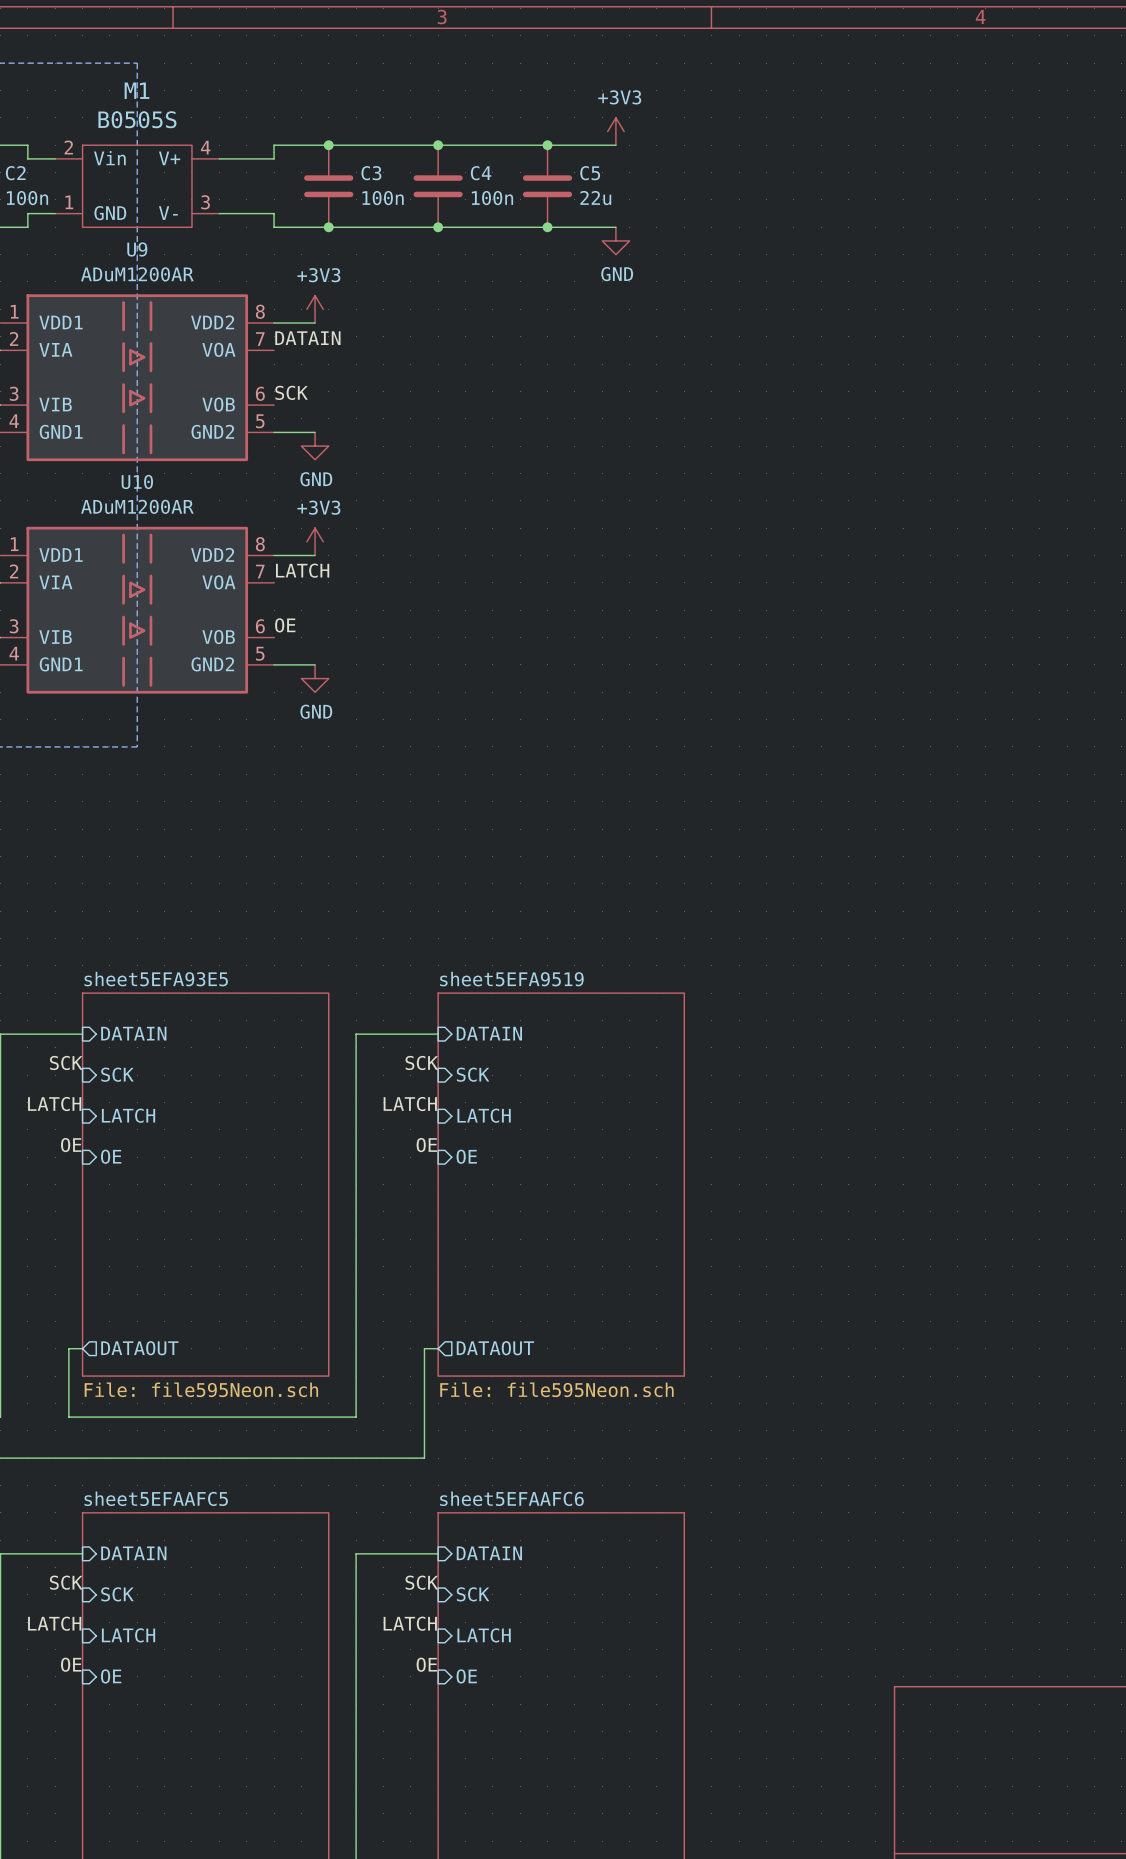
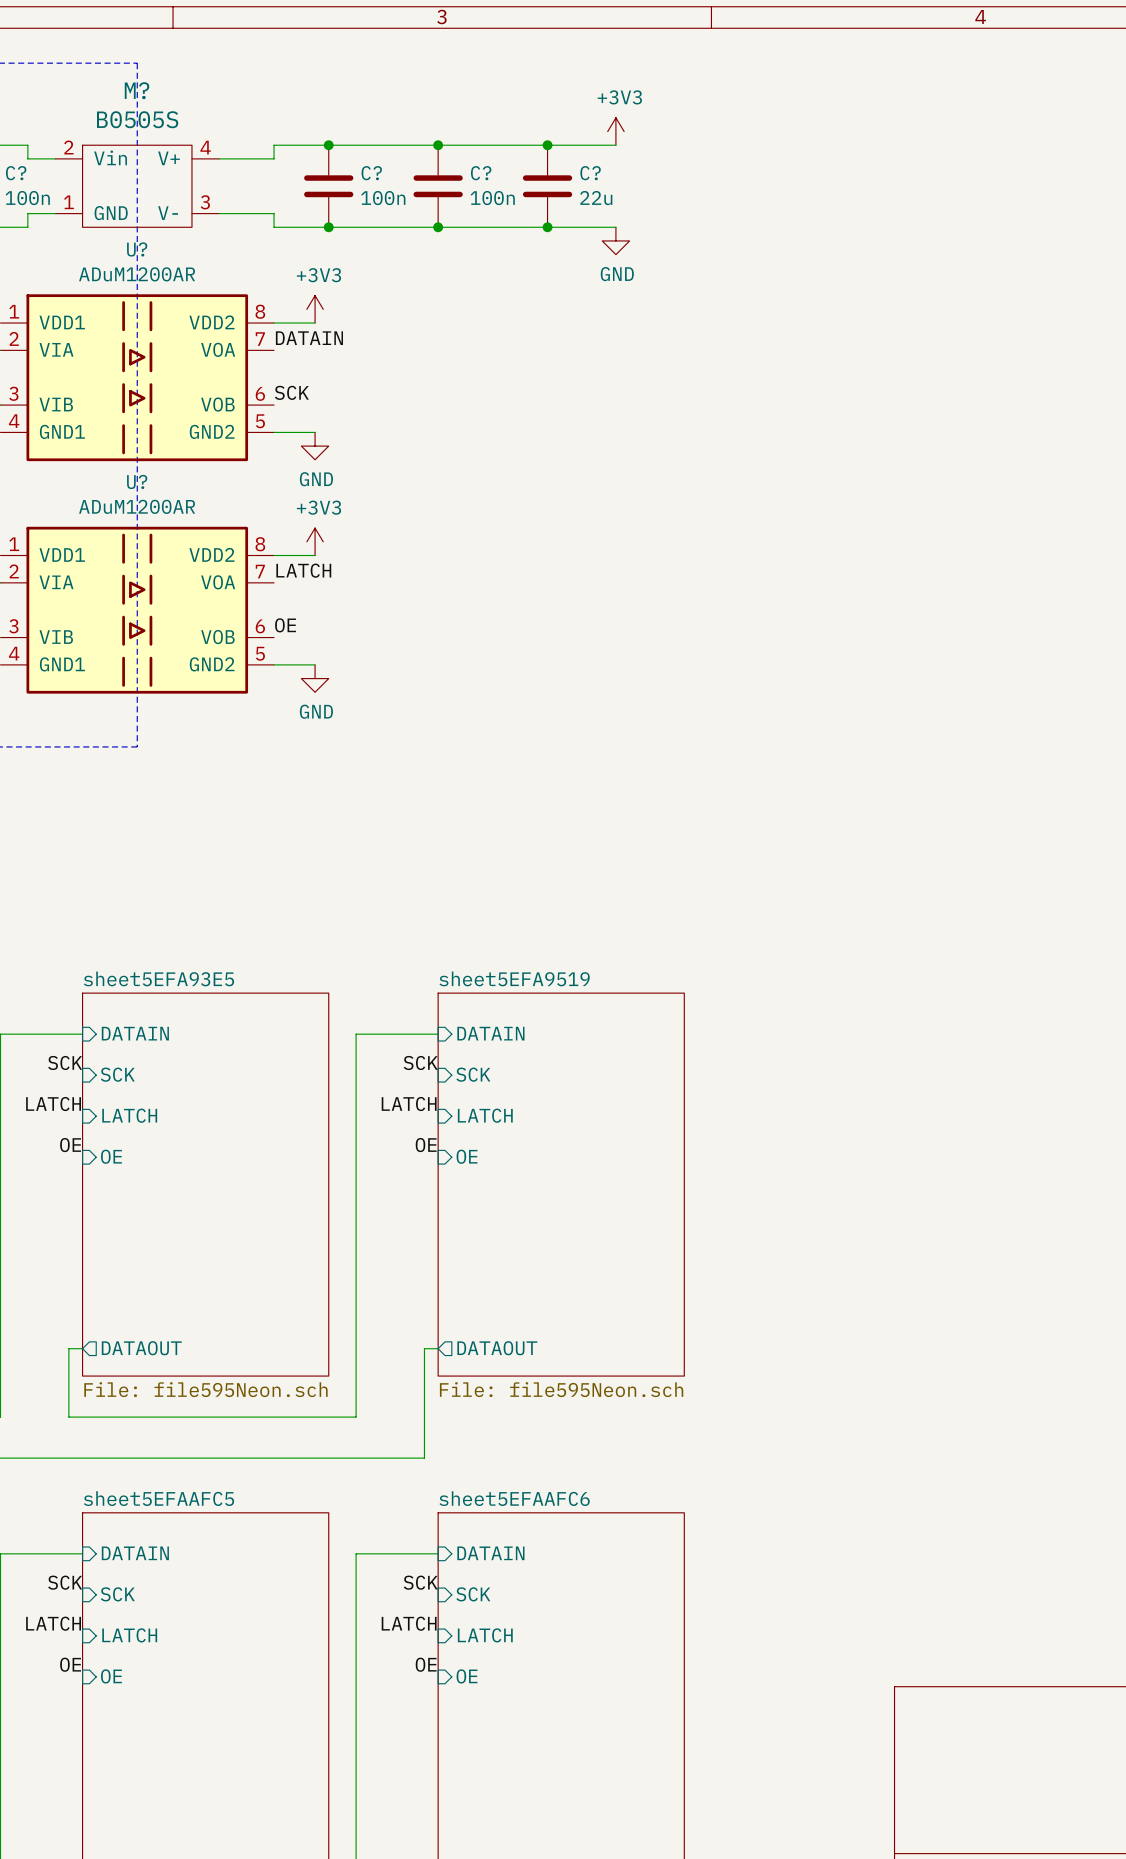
M1 name: M1 (136, 90) -> M? (137, 90)
C2 name: C2 (15, 173) -> C? (16, 173)
C3 name: C3 (371, 173) -> C? (371, 173)
C4 name: C4 (481, 173) -> C? (481, 173)
C5 name: C5 (590, 173) -> C? (590, 173)
U9 name: U9 (137, 249) -> U? (137, 249)
U10 name: U10 (137, 481) -> U? (137, 481)

